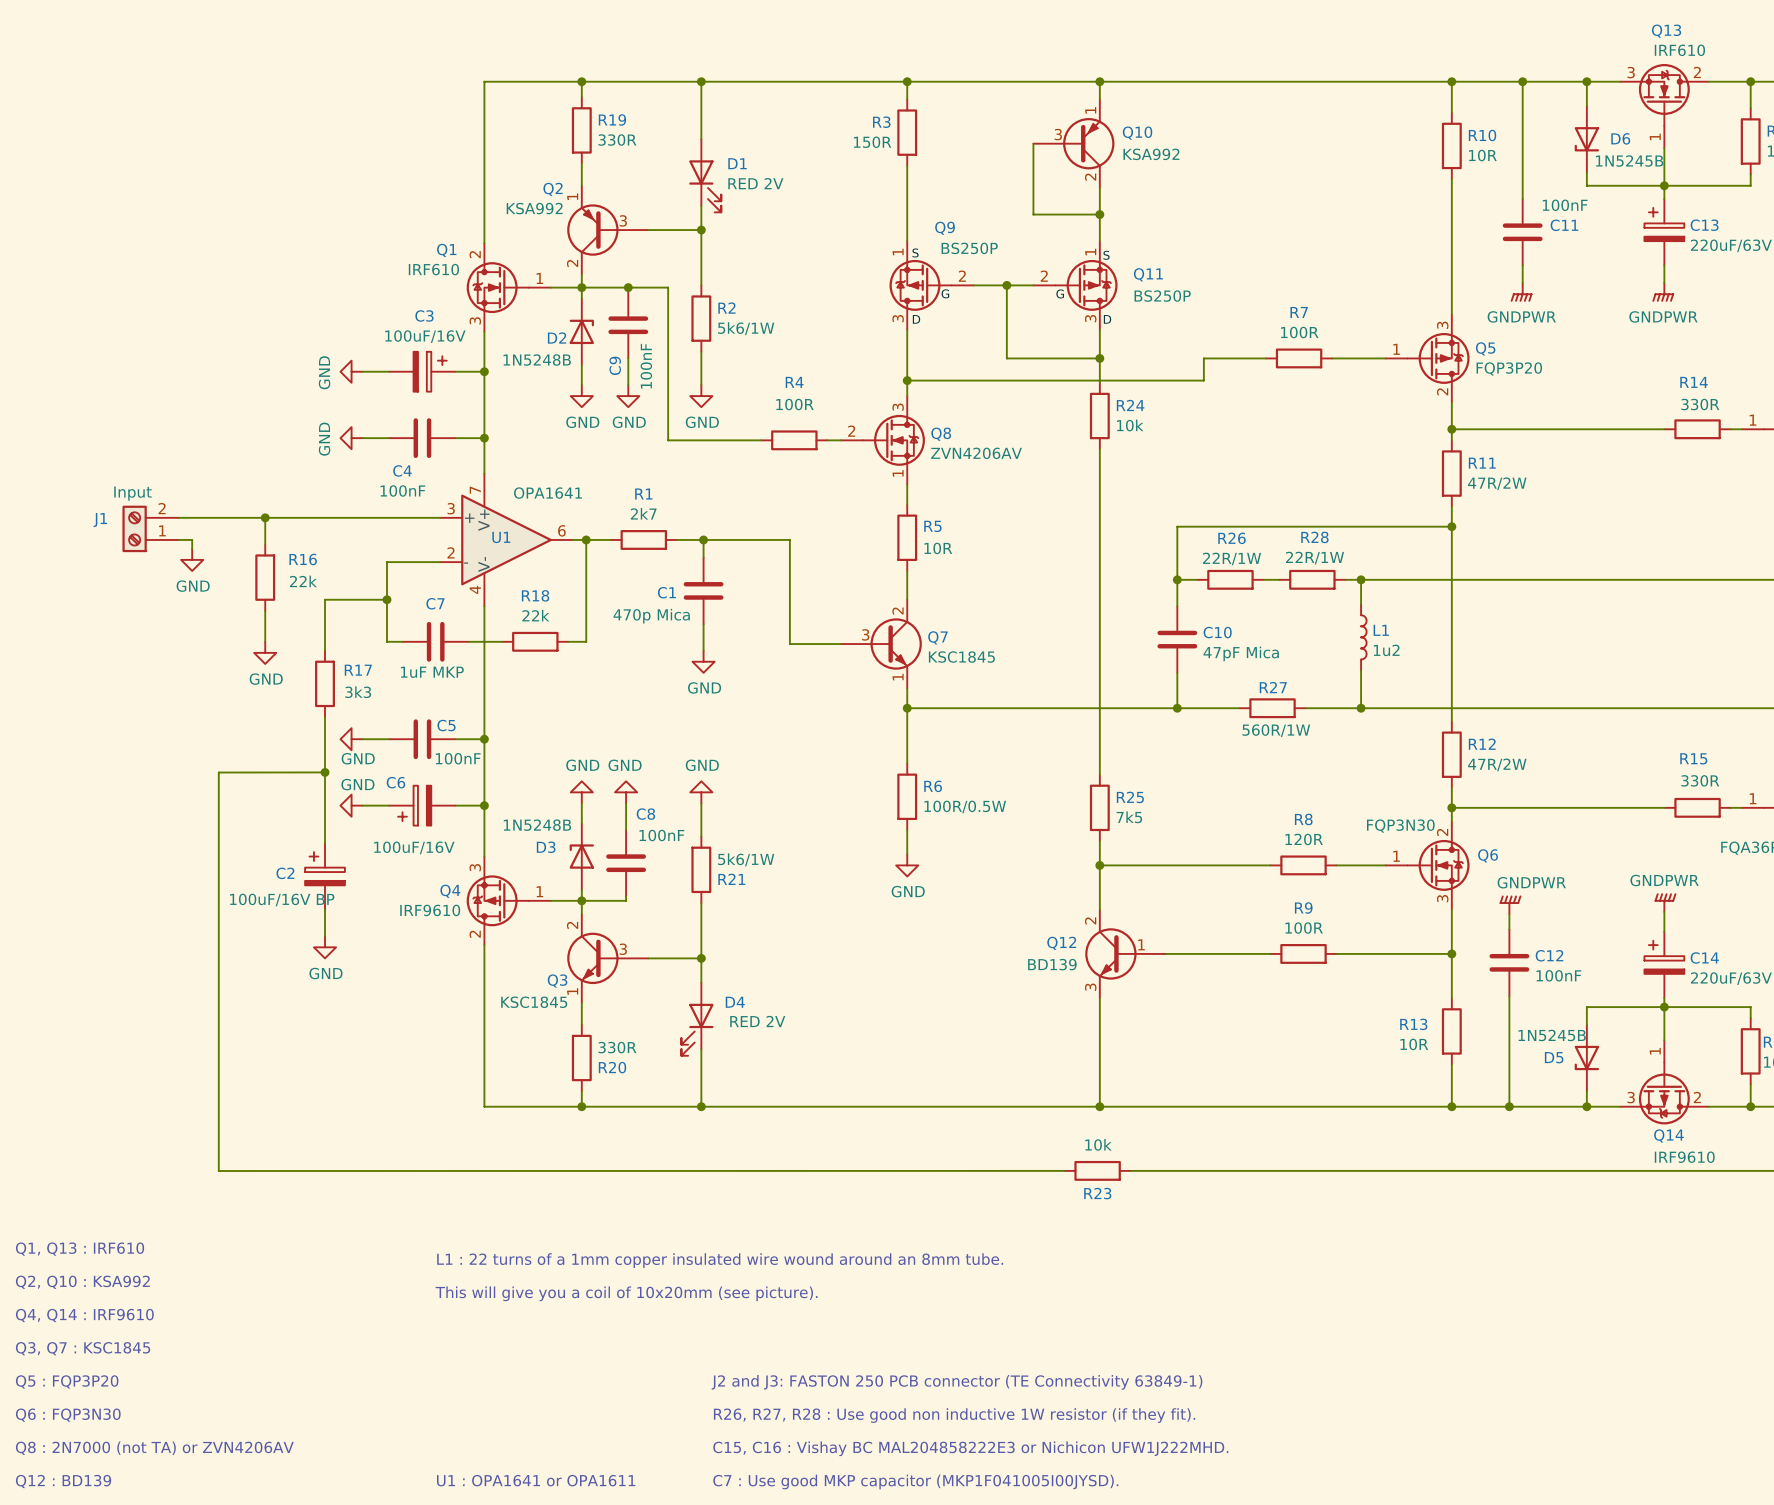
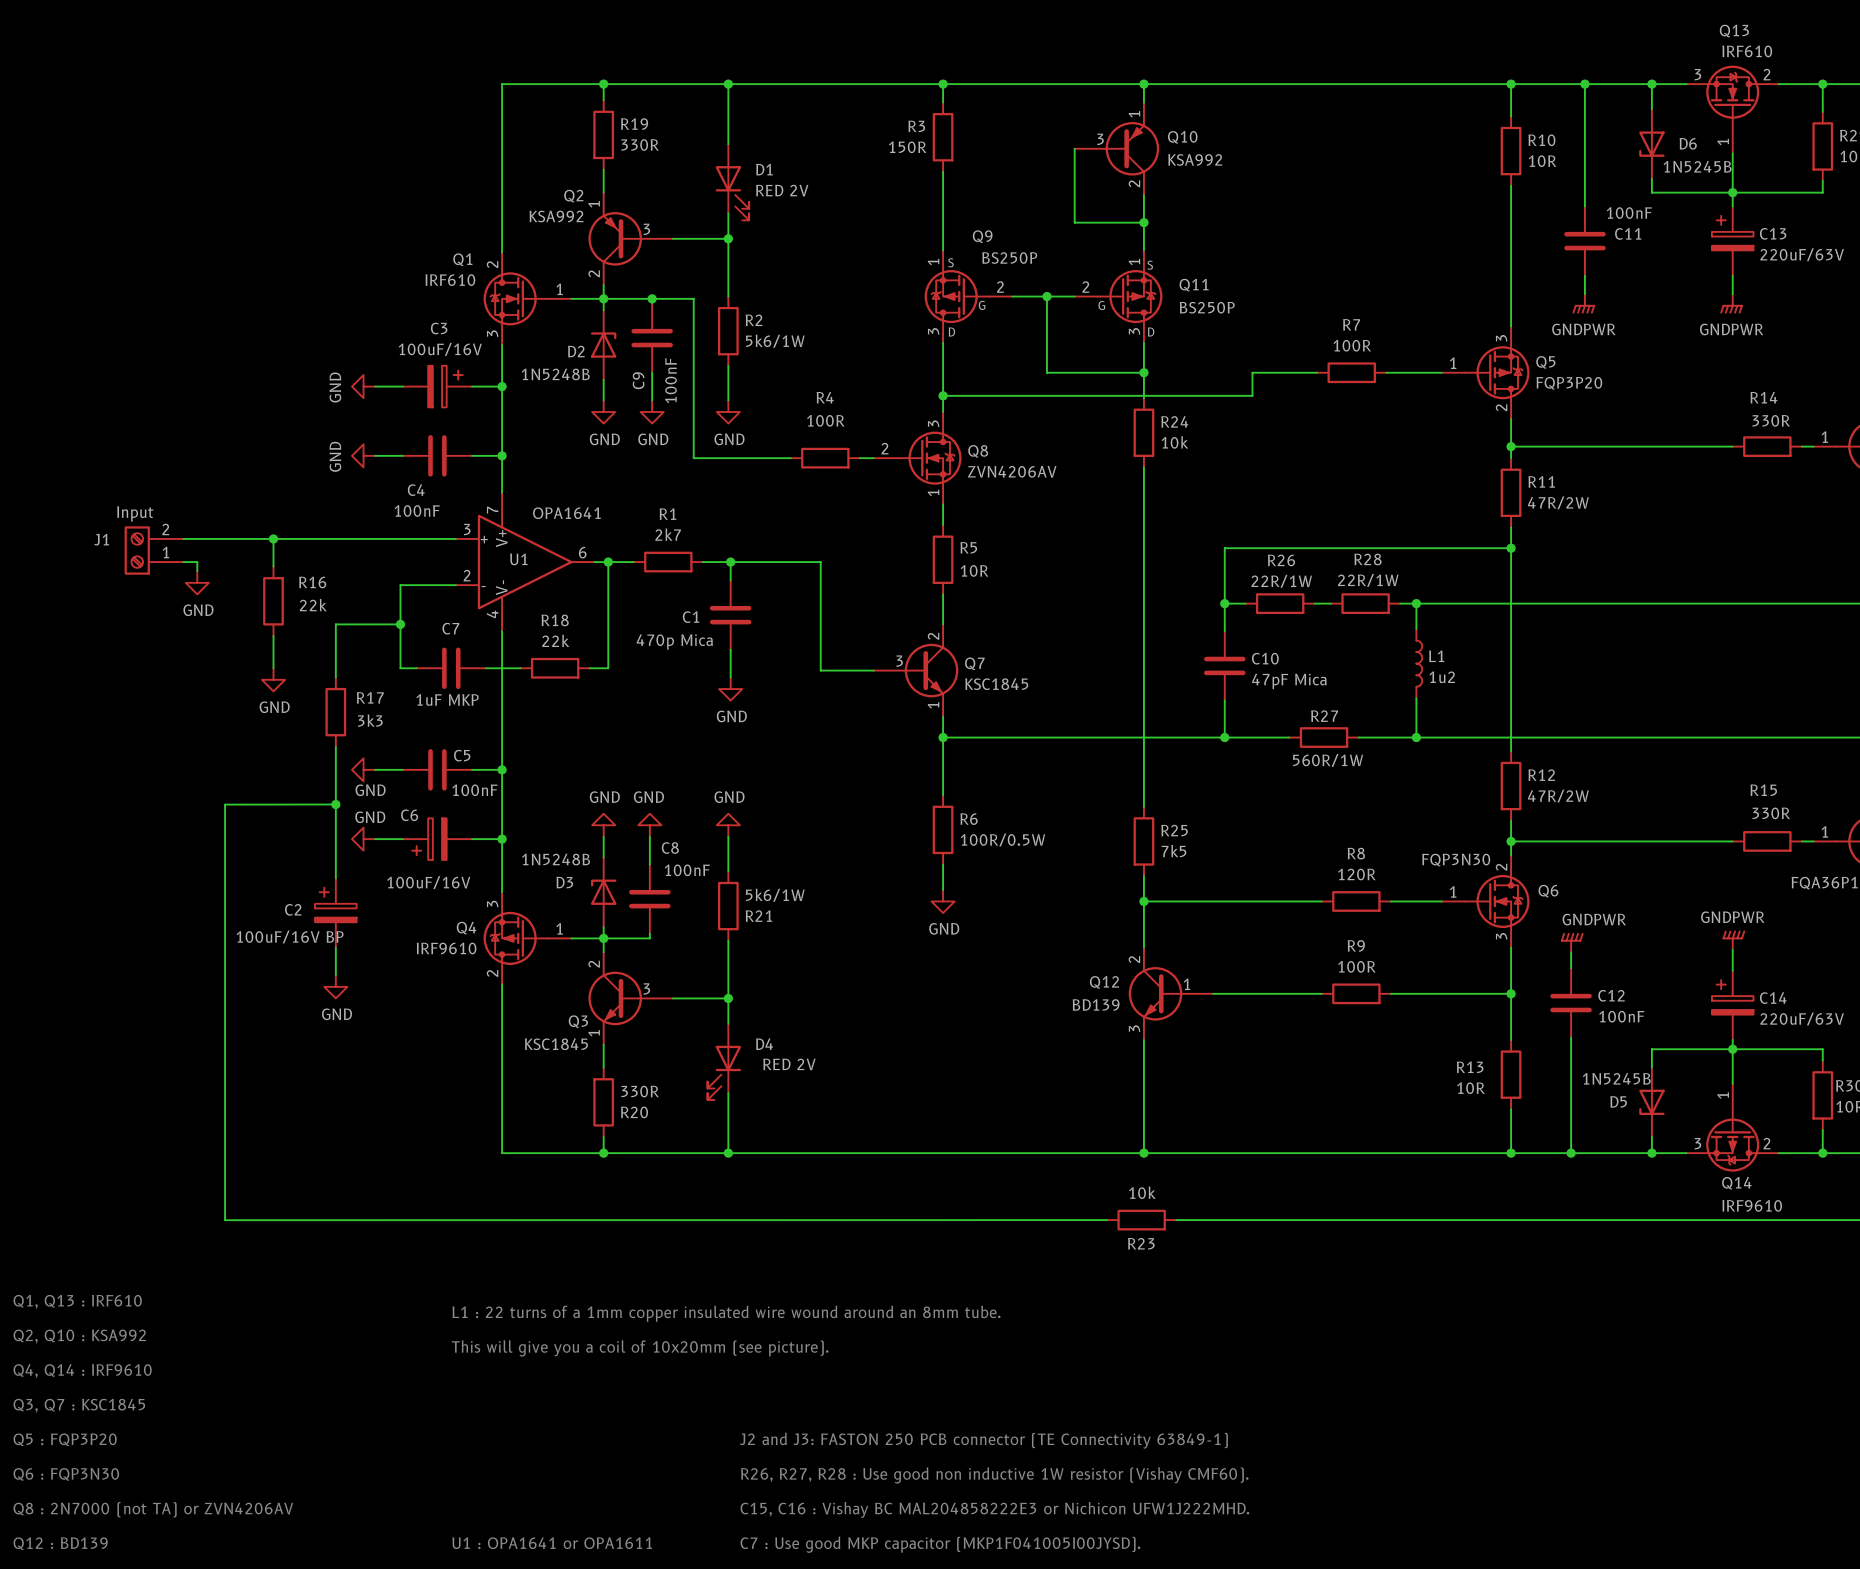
text: R26, R27, R28 : Use good non inductive 1W resistor (if they fit). (954, 1415) -> R26, R27, R28 : Use good non inductive 1W resistor (Vishay CMF60). (994, 1475)

